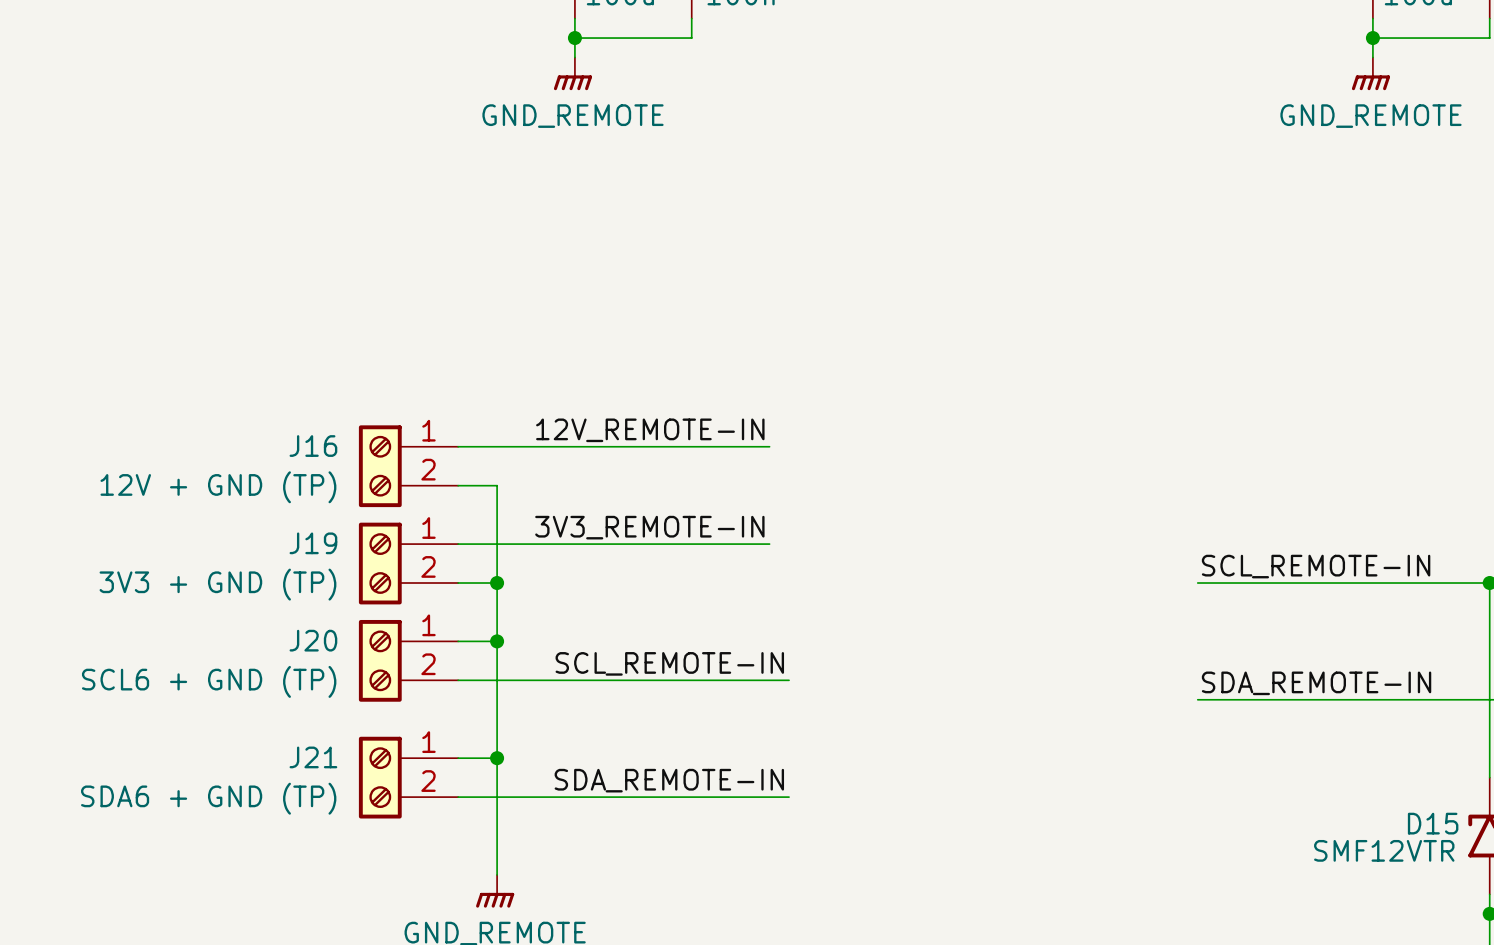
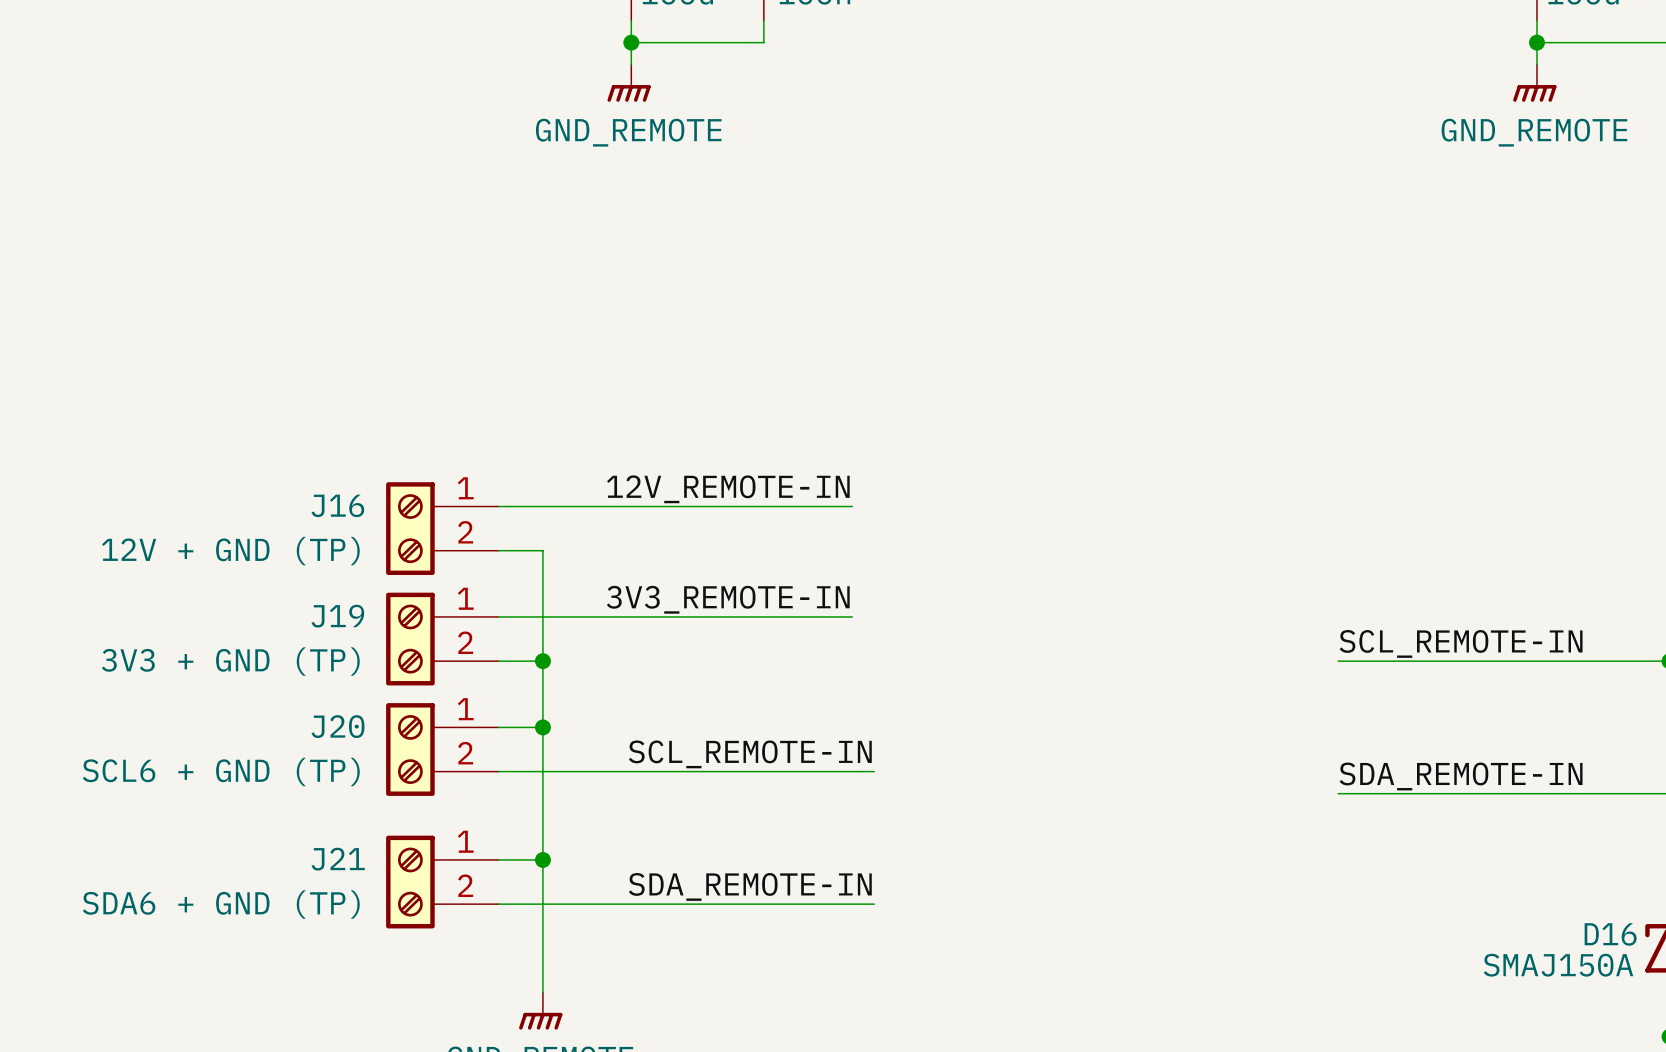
D15 name: D15 (1433, 823) -> D16 (1610, 934)
D15 value: SMF12VTR (1384, 850) -> SMAJ150A (1558, 965)

